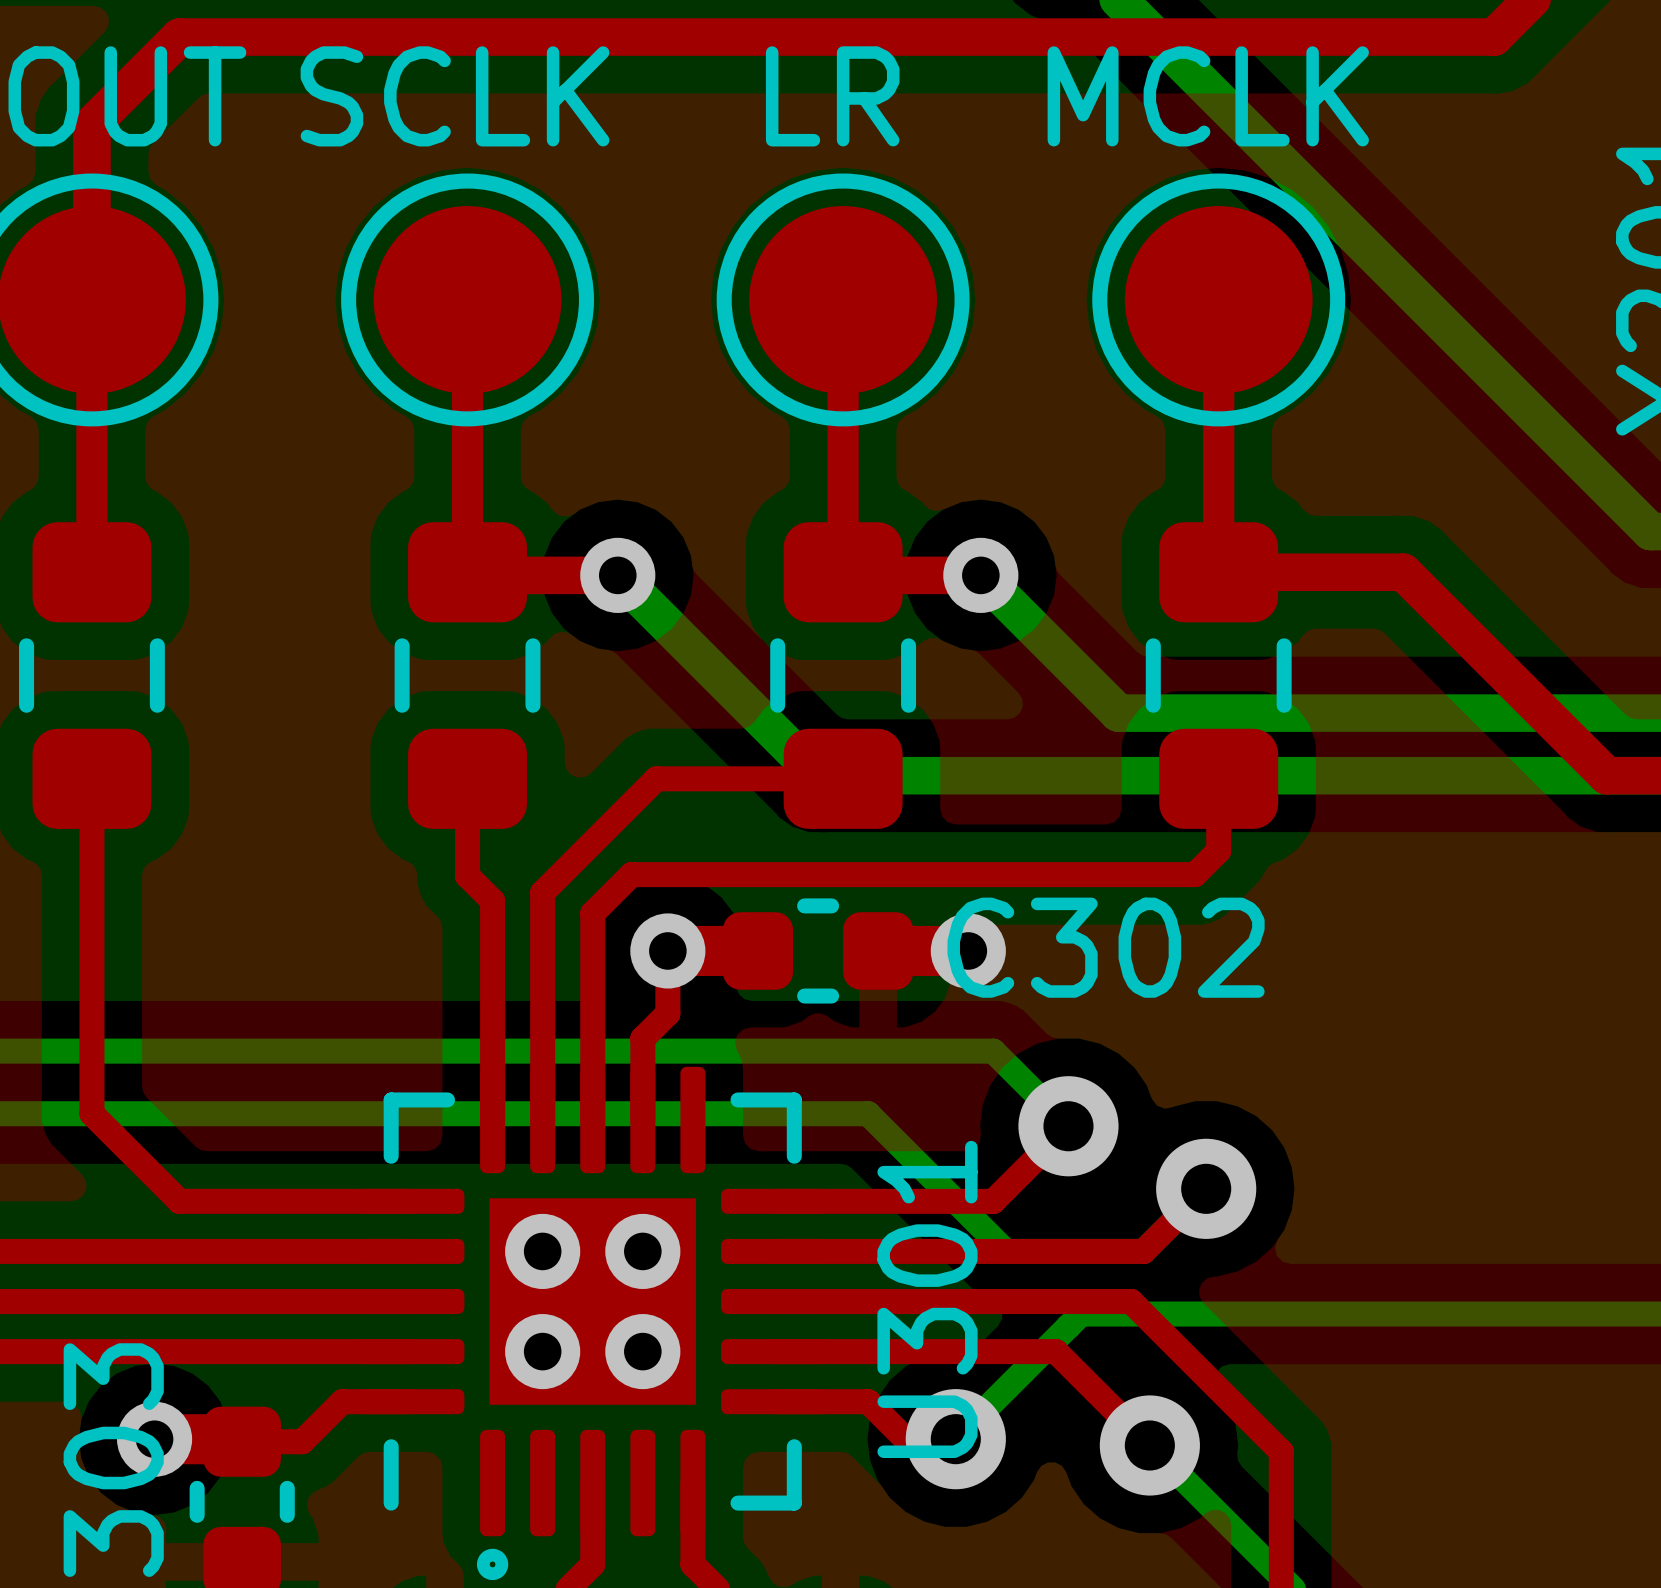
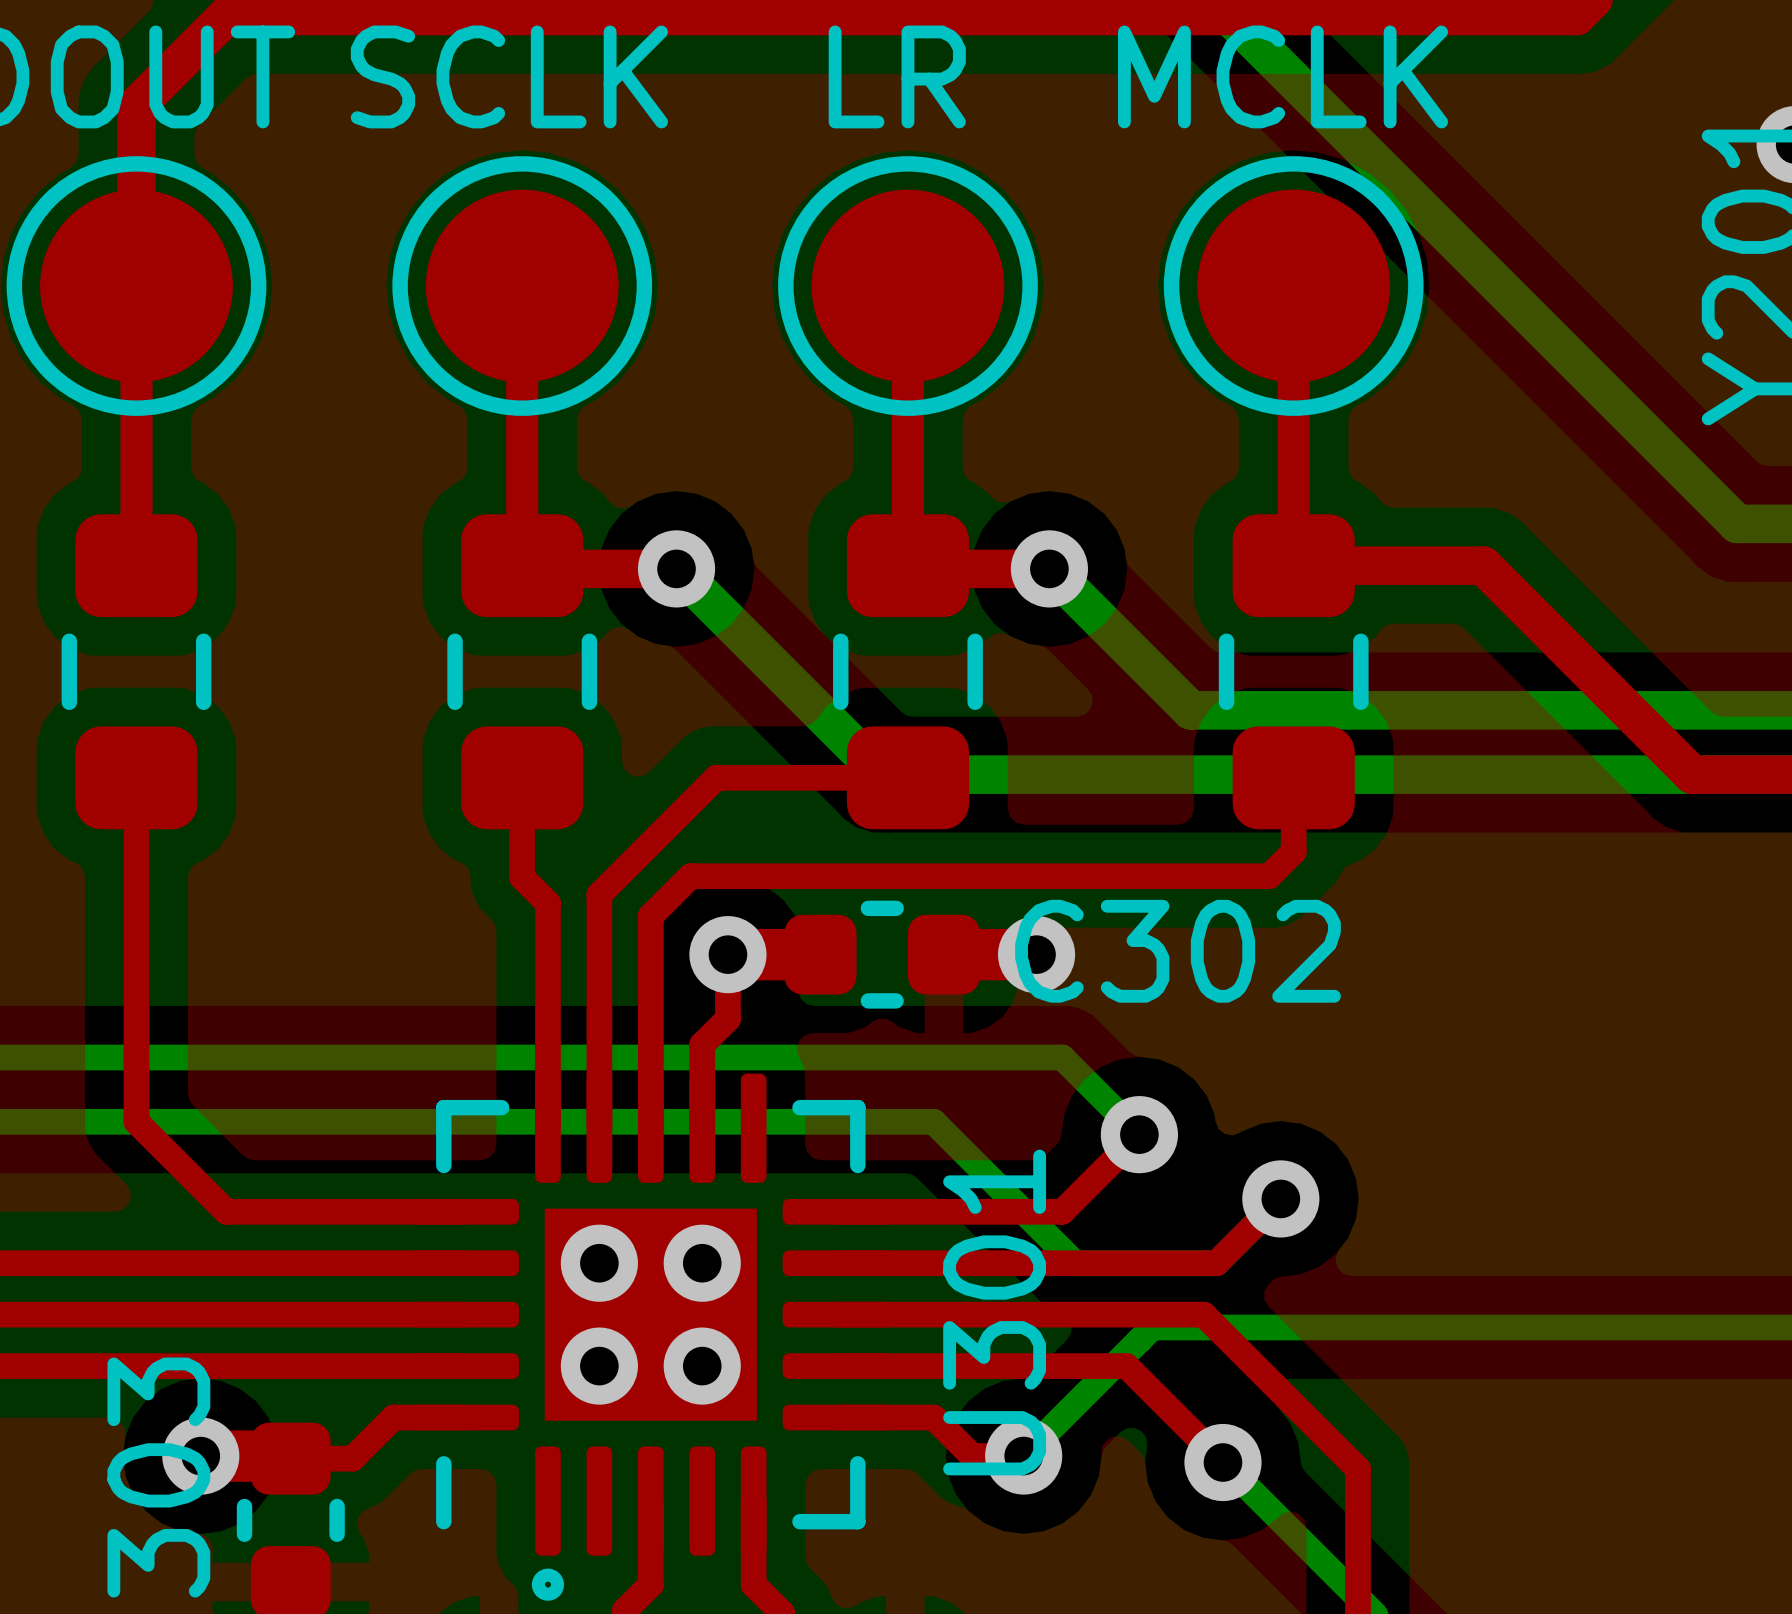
via size: [1018, 1076, 1119, 1177] -> [1100, 1096, 1178, 1174]
via size: [1156, 1138, 1257, 1239] -> [1242, 1160, 1320, 1238]
via size: [905, 1389, 1006, 1490] -> [985, 1417, 1063, 1495]
via size: [1099, 1395, 1200, 1496] -> [1184, 1423, 1262, 1502]

